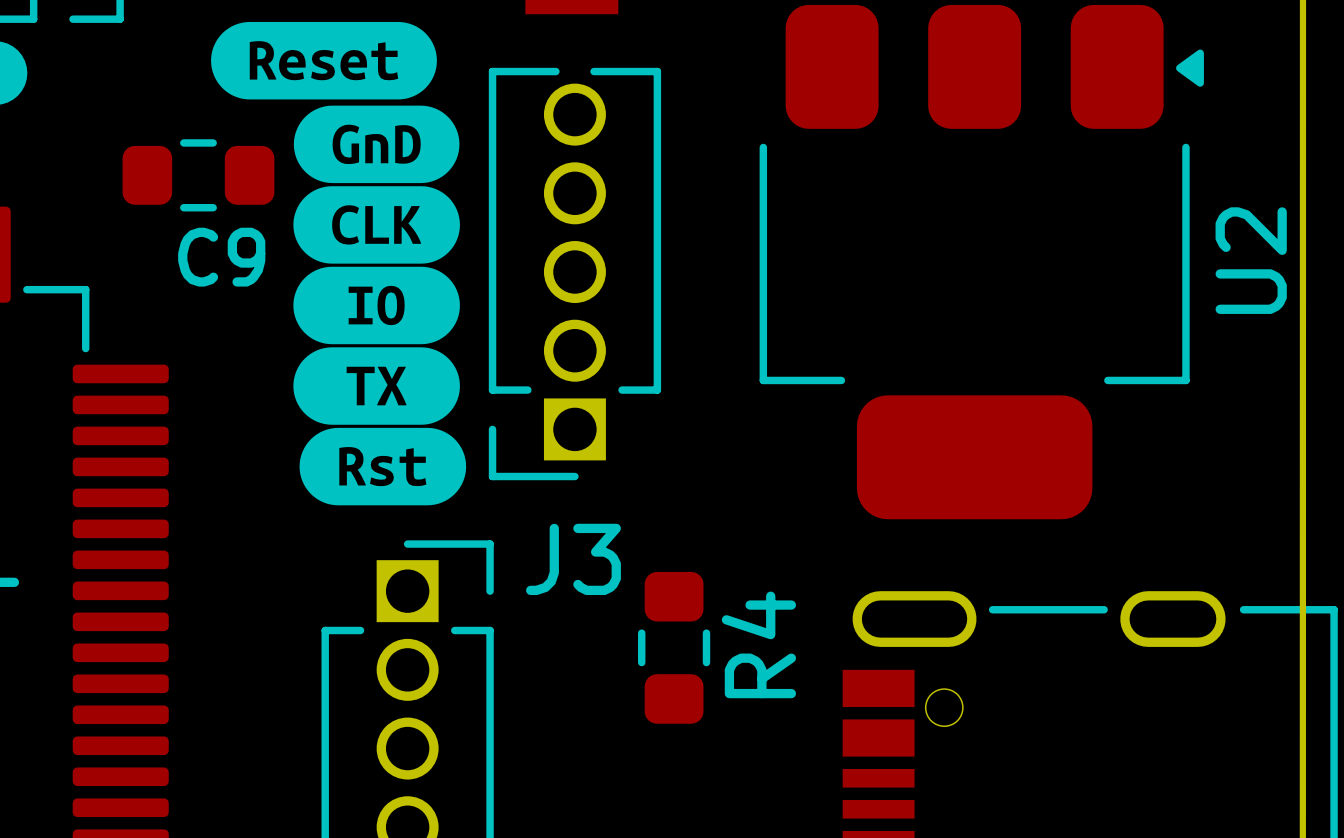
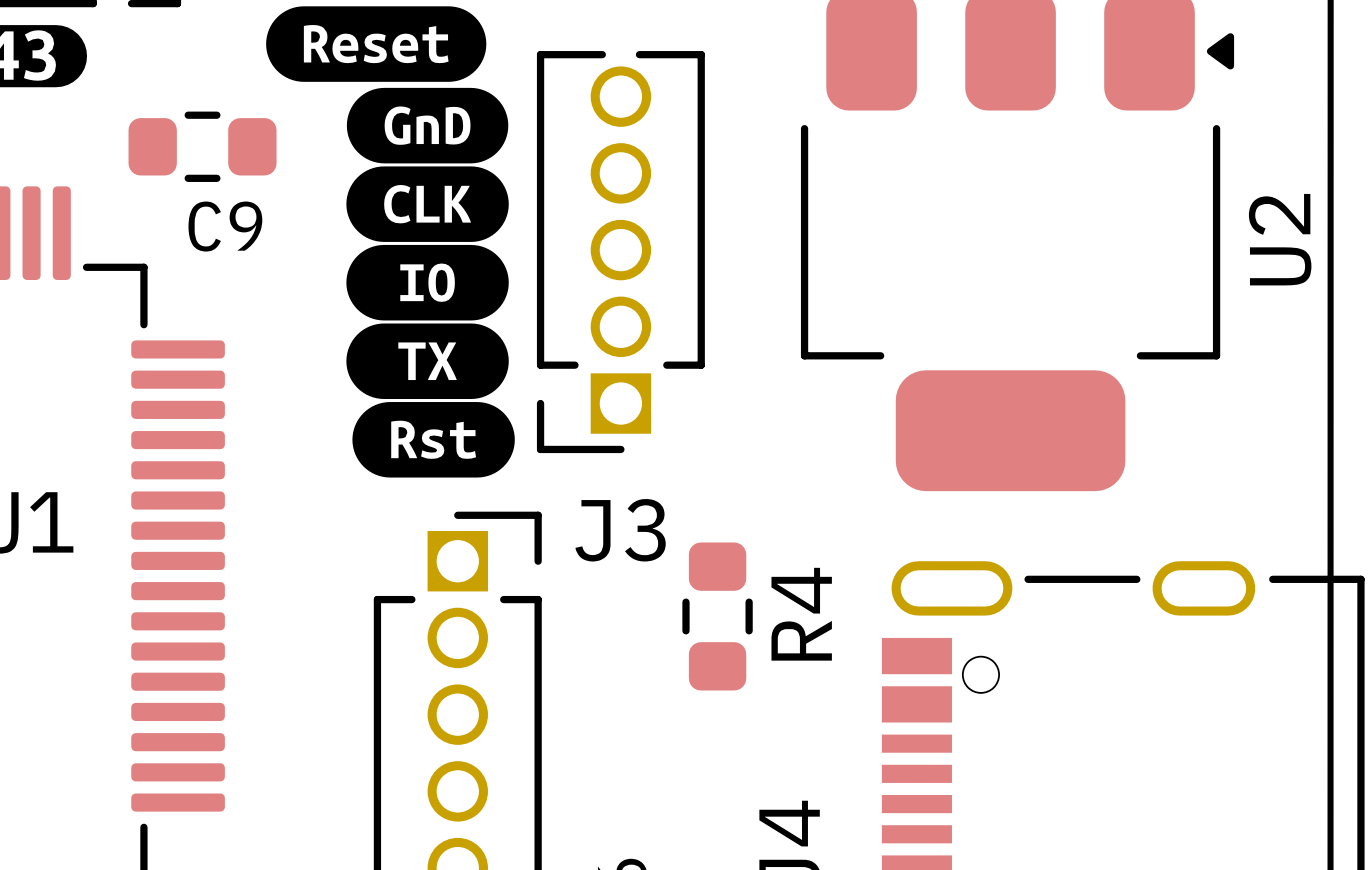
C9 position: (198, 175) -> (202, 146)

